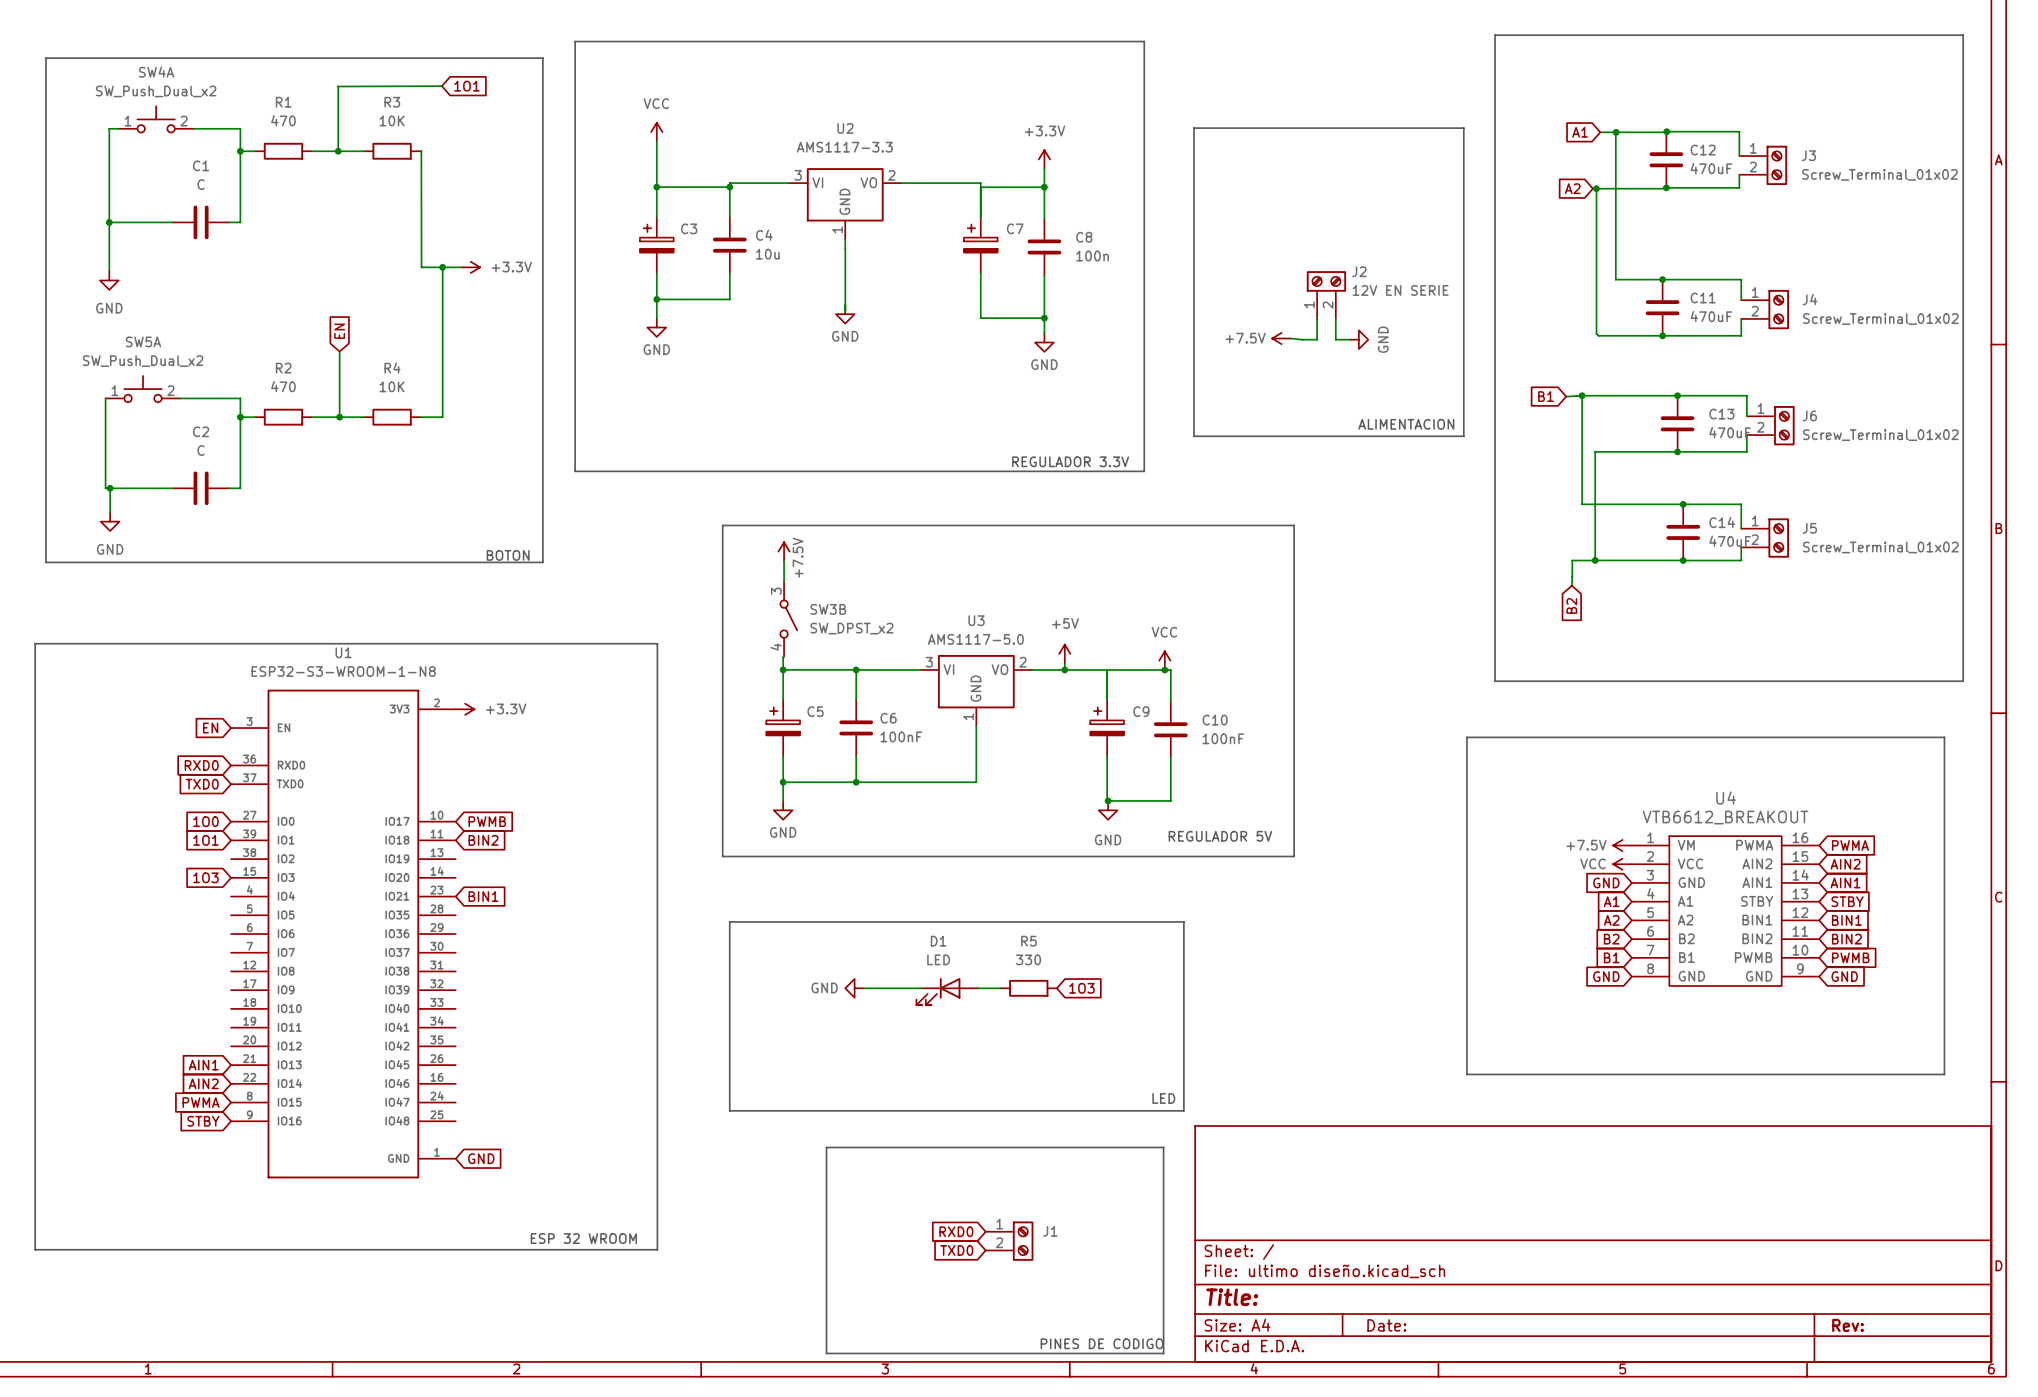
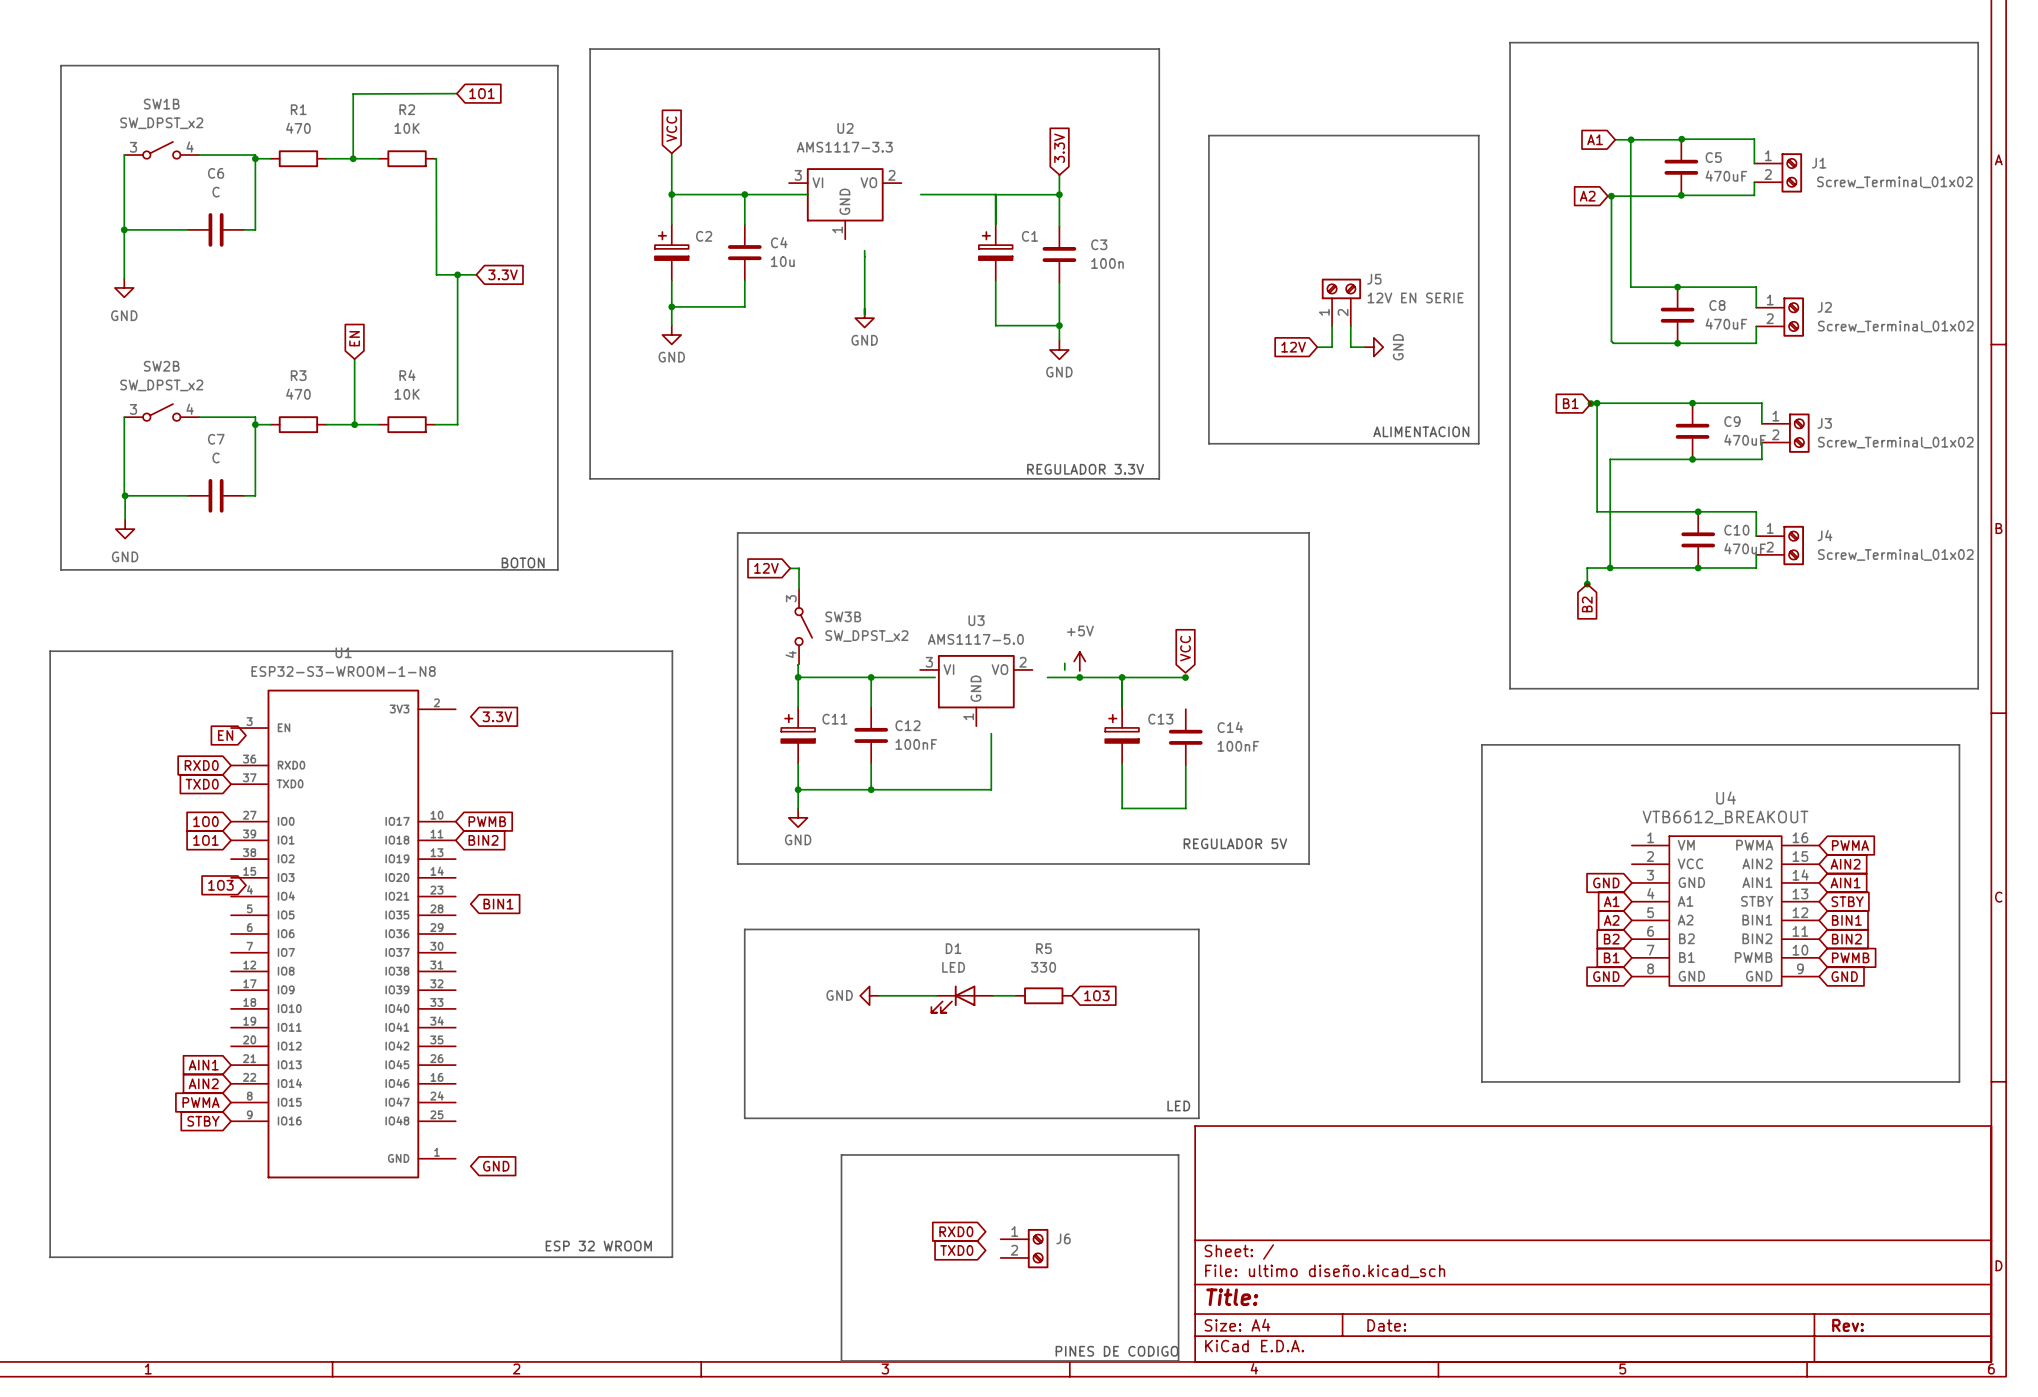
line: (1495, 35) (1963, 35) (1963, 681) (1495, 681) (1495, 35) -> (1510, 42) (1978, 42) (1978, 688) (1510, 688) (1510, 42)
line: (575, 41) (1144, 41) (1144, 471) (575, 471) (575, 41) -> (590, 49) (1159, 49) (1159, 478) (590, 478) (590, 49)
line: (46, 58) (542, 58) (542, 562) (46, 562) (46, 58) -> (60, 65) (557, 65) (557, 569) (60, 569) (60, 65)
wire: (441, 86) (338, 86) (338, 151) -> (456, 93) (353, 93) (353, 158)
global label position: 1O1 (466, 86) -> 1O1 (481, 93)
SW4A: SW_Push_Dual_x2 (156, 119) -> none
R3 value: 10K (392, 120) -> 470 (298, 394)
wire: (118, 128) (109, 128) (109, 271) -> none
wire: (193, 128) (240, 128) (240, 222) (229, 222) -> none
line: (1193, 128) (1463, 128) (1463, 436) (1193, 436) (1193, 128) -> (1208, 135) (1478, 135) (1478, 443) (1208, 443) (1208, 135)
global label: none -> VCC (671, 129)
wire: (1666, 131) (1600, 132) -> (1681, 139) (1615, 139)
wire: (1666, 131) (1739, 131) (1739, 156) -> (1681, 139) (1754, 139) (1754, 163)
junction position: (1666, 131) -> (1681, 139)
power symbol: VCC (656, 132) -> none
global label position: A1 (1580, 132) -> A1 (1595, 139)
wire: (1616, 132) (1615, 279) (1741, 279) (1741, 300) -> (1631, 139) (1630, 287) (1756, 287) (1756, 307)
junction position: (1616, 132) -> (1631, 139)
wire: (656, 141) (656, 217) -> none
global label: none -> 3.3V (1059, 148)
SW1B: none -> SW_DPST_x2 (161, 150)
wire: (240, 151) (255, 151) -> (255, 158) (270, 158)
junction position: (240, 151) -> (255, 158)
R1 position: (283, 151) -> (298, 158)
wire: (311, 151) (363, 151) -> (326, 158) (378, 158)
junction position: (338, 151) -> (353, 158)
R3 position: (392, 151) -> (298, 424)
wire: (420, 151) (421, 267) (461, 267) -> (435, 158) (436, 274) (476, 274)
wire: none -> (671, 153) (671, 224)
wire: none -> (124, 155) (124, 278)
wire: none -> (199, 155) (255, 155) (255, 229) (244, 229)
J3 name position: J3 (1808, 155) -> J3 (1824, 423)
power symbol: +3.3V (1044, 159) -> none
C12 position: (1666, 159) -> (871, 735)
C1 name position: C1 (201, 165) -> C1 (1029, 236)
J3 position: (1763, 165) -> (1785, 433)
wire: (1044, 168) (1044, 218) -> none
C12 value: 470uF (1711, 168) -> 100nF (916, 744)
wire: none -> (1059, 174) (1059, 226)
wire: (1739, 174) (1739, 187) (1592, 188) -> (1754, 182) (1754, 195) (1607, 196)
J3 value position: Screw_Terminal_01x02 (1879, 174) -> Screw_Terminal_01x02 (1895, 442)
C5 value: none -> 470uF (1726, 176)
J1 value: none -> Screw_Terminal_01x02 (1894, 182)
wire: (789, 183) (729, 183) (729, 217) -> none
wire: (901, 183) (980, 183) (980, 217) (980, 187) (1044, 187) -> none
C1 value: C (201, 184) -> none
wire: (656, 187) (729, 187) -> none
junction position: (656, 187) -> (671, 194)
junction position: (729, 187) -> (744, 194)
junction position: (1044, 187) -> (1059, 194)
junction position: (1666, 187) -> (1681, 195)
global label position: A2 (1572, 188) -> A2 (1587, 196)
wire: (1596, 188) (1596, 333) (1598, 335) (1741, 335) (1741, 318) -> (1611, 196) (1611, 341) (1613, 343) (1756, 343) (1756, 326)
junction position: (1596, 188) -> (1611, 196)
wire: none -> (671, 194) (808, 194)
wire: none -> (744, 194) (744, 224)
wire: none -> (920, 194) (995, 194) (995, 224) (995, 194) (1059, 194)
C1 symbol: [172, 205, 230, 240] -> [978, 224, 1013, 281]
C3 symbol: [639, 217, 674, 274] -> [1042, 226, 1077, 283]
C7 symbol: [963, 217, 998, 274] -> [187, 478, 245, 513]
wire: (109, 222) (172, 222) -> (124, 229) (187, 229)
junction position: (109, 222) -> (124, 229)
C7 name position: C7 (1015, 228) -> C7 (216, 439)
wire: (845, 239) (845, 310) (845, 304) -> none
C4 position: (729, 245) -> (744, 252)
C8 position: (1044, 247) -> (1677, 315)
wire: none -> (864, 250) (864, 314) (864, 308)
C8 value: 100n (1092, 256) -> 470uF (1726, 323)
C3 value: none -> 100n (1107, 263)
wire: (442, 267) (442, 417) (420, 417) -> (457, 274) (457, 424) (435, 424)
junction position: (442, 267) -> (457, 274)
power symbol: +3.3V (470, 267) -> none
J2 name position: J2 (1359, 271) -> J2 (1824, 307)
wire: (656, 273) (656, 318) -> (671, 280) (671, 325)
wire: (729, 273) (729, 299) (656, 299) -> (744, 280) (744, 306) (671, 306)
wire: (980, 273) (980, 318) (1044, 318) -> (995, 280) (995, 325) (1059, 325)
global label: none -> 3.3V (503, 274)
wire: (1044, 275) (1044, 333) -> (1059, 282) (1059, 340)
C11 symbol: [1645, 279, 1680, 336] -> [781, 707, 816, 764]
junction position: (1662, 279) -> (1677, 287)
power symbol position: GND (109, 280) -> GND (124, 287)
J2 rotation: 0° (1326, 281) -> 90° clockwise (1793, 317)
J2 value: 12V EN SERIE (1400, 290) -> Screw_Terminal_01x02 (1895, 326)
J2 position: (1326, 295) -> (1780, 317)
junction position: (656, 299) -> (671, 306)
J4 position: (1765, 309) -> (1780, 545)
power symbol position: GND (845, 314) -> GND (864, 318)
C11 value: 470uF (1711, 316) -> none
junction position: (1044, 318) -> (1059, 325)
wire: (1317, 318) (1317, 339) (1290, 338) -> none
wire: (1335, 318) (1335, 339) (1349, 339) -> (1350, 326) (1350, 347) (1364, 347)
wire: none -> (1332, 326) (1332, 347) (1317, 347)
power symbol position: GND (656, 327) -> GND (671, 335)
global label position: EN (339, 331) -> EN (354, 338)
junction position: (1662, 335) -> (1677, 343)
power symbol: +7.5V (1281, 338) -> none
power symbol position: GND (1358, 339) -> GND (1373, 347)
power symbol position: GND (1044, 342) -> GND (1059, 349)
global label: none -> 12V (1293, 347)
wire: (339, 351) (339, 417) -> (354, 359) (354, 424)
R2 value: 470 (283, 386) -> 10K (407, 128)
SW5A: SW_Push_Dual_x2 (143, 389) -> none
wire: (1582, 395) (1582, 504) (1741, 504) (1741, 528) -> (1597, 403) (1597, 511) (1756, 511) (1756, 536)
wire: (1582, 395) (1746, 395) (1746, 416) -> (1597, 403) (1761, 403) (1761, 423)
wire: (1582, 395) (1566, 396) -> none
junction: (1582, 395) -> none
C13 symbol: [1660, 395, 1695, 452] -> [1105, 707, 1139, 764]
junction position: (1677, 395) -> (1692, 403)
global label position: B1 (1546, 396) -> B1 (1570, 403)
wire: (105, 398) (105, 488) (172, 488) -> none
wire: (180, 398) (240, 398) (240, 488) (229, 488) -> none
junction: none -> (1590, 403)
junction: none -> (1597, 403)
SW2B: none -> SW_DPST_x2 (161, 412)
wire: none -> (124, 417) (124, 495) (187, 495)
wire: none -> (199, 417) (240, 417)
junction position: (240, 417) -> (255, 424)
wire: none -> (255, 417) (255, 495) (244, 495)
R2 position: (283, 417) -> (407, 158)
wire: (311, 417) (363, 417) -> (326, 424) (378, 424)
junction position: (339, 417) -> (354, 424)
R4 position: (392, 417) -> (407, 424)
wire: none -> (255, 424) (270, 424)
text position: ALIMENTACION (1406, 424) -> ALIMENTACION (1421, 431)
J6 position: (1770, 425) -> (1024, 1248)
C2 name position: C2 (201, 431) -> C2 (704, 236)
C13 value: 470uF (1730, 432) -> none
wire: (1746, 435) (1746, 451) (1595, 451) (1595, 560) -> (1761, 442) (1761, 459) (1610, 459) (1610, 568)
J6 value: Screw_Terminal_01x02 (1880, 435) -> none
C9 value: none -> 470uF (1745, 440)
C2 value: C (201, 450) -> none
junction position: (1677, 451) -> (1692, 459)
C7 value: none -> C (216, 458)
text position: REGULADOR 3.3V (1070, 461) -> REGULADOR 3.3V (1085, 469)
C2 symbol: [172, 471, 230, 506] -> [654, 224, 689, 281]
wire: (110, 488) (110, 512) -> (125, 495) (125, 519)
junction position: (110, 488) -> (125, 495)
junction position: (1683, 504) -> (1698, 511)
power symbol position: GND (110, 521) -> GND (125, 529)
C14 name position: C14 (1722, 522) -> C14 (1230, 727)
line: (722, 525) (1294, 525) (1294, 856) (722, 856) (722, 525) -> (737, 532) (1309, 532) (1309, 863) (737, 863) (737, 532)
J5 name position: J5 (1809, 528) -> J5 (1374, 279)
C14 position: (1683, 532) -> (1185, 737)
J5 position: (1765, 538) -> (1341, 302)
J5 rotation: 0° (1778, 538) -> 90° counterclockwise (1341, 288)
C14 value: 470uF (1730, 541) -> 100nF (1238, 746)
wire: (1741, 547) (1741, 560) (1683, 560) -> (1756, 554) (1756, 568) (1698, 568)
J5 value: Screw_Terminal_01x02 (1880, 547) -> 12V EN SERIE (1415, 297)
power symbol: +7.5V (784, 551) -> none
text position: BOTON (508, 555) -> BOTON (523, 562)
wire: (1595, 560) (1683, 560) -> (1610, 567) (1698, 567)
wire: (1595, 560) (1572, 560) (1571, 585) -> none
junction: (1595, 560) -> none
junction position: (1683, 560) -> (1698, 568)
wire: (784, 561) (784, 581) -> (799, 568) (799, 589)
junction: none -> (1610, 567)
global label: none -> 12V (766, 568)
wire: none -> (790, 568) (799, 568)
wire: none -> (1610, 568) (1587, 568) (1587, 584)
junction: none -> (1587, 584)
global label position: B2 (1571, 605) -> B2 (1587, 604)
SW3B position: (788, 619) -> (803, 626)
line: (35, 643) (657, 643) (657, 1249) (35, 1249) (35, 643) -> (50, 651) (672, 651) (672, 1257) (50, 1257) (50, 651)
global label: none -> VCC (1185, 648)
power symbol position: +5V (1064, 653) -> +5V (1079, 661)
wire: (784, 656) (783, 699) -> (799, 664) (798, 707)
power symbol: VCC (1164, 660) -> none
wire: (783, 669) (856, 669) (856, 699) -> (798, 677) (871, 677) (871, 707)
junction position: (783, 669) -> (798, 677)
wire: (856, 669) (920, 669) -> (871, 677) (935, 677)
junction position: (856, 669) -> (871, 677)
wire: (1032, 669) (1107, 669) (1107, 699) (1107, 670) (1170, 670) (1170, 701) -> none
junction position: (1064, 669) -> (1079, 677)
junction: (1164, 670) -> none
wire: none -> (1047, 677) (1185, 677)
wire: none -> (1122, 677) (1122, 707) (1122, 677)
junction: none -> (1122, 677)
junction: none -> (1185, 677)
C5 symbol: [766, 699, 801, 757] -> [1664, 139, 1699, 196]
C9 symbol: [1090, 699, 1124, 757] -> [1675, 403, 1710, 460]
power symbol: +3.3V (465, 709) -> none
global label: none -> 3.3V (497, 716)
C6 name position: C6 (888, 718) -> C6 (216, 173)
C10 name position: C10 (1215, 720) -> C10 (1736, 530)
wire: (976, 726) (976, 782) (783, 782) -> (991, 733) (991, 789) (798, 789)
C6 rotation: 0° (856, 727) -> 90° clockwise (216, 229)
C6 position: (856, 727) -> (216, 229)
global label position: EN (210, 728) -> EN (225, 735)
C10 position: (1170, 729) -> (1698, 539)
C6 value: 100nF (901, 736) -> C (216, 192)
line: (1466, 737) (1944, 737) (1944, 1074) (1466, 1074) (1466, 737) -> (1481, 744) (1959, 744) (1959, 1081) (1481, 1081) (1481, 744)
C10 value: 100nF (1223, 738) -> 470uF (1745, 548)
wire: (783, 756) (783, 800) -> (798, 763) (798, 808)
wire: (856, 756) (856, 782) -> (871, 763) (871, 789)
wire: (1107, 756) (1107, 800) (1170, 800) (1170, 757) -> (1122, 763) (1122, 808) (1185, 808) (1185, 765)
junction position: (783, 782) -> (798, 789)
junction position: (856, 782) -> (871, 789)
junction: (1108, 800) -> none
power symbol position: GND (783, 810) -> GND (798, 817)
power symbol: GND (1108, 810) -> none
text position: REGULADOR 5V (1220, 836) -> REGULADOR 5V (1235, 843)
power symbol: +7.5V (1622, 845) -> none
power symbol: VCC (1622, 864) -> none
global label position: 1O3 (205, 877) -> 1O3 (220, 885)
global label position: BIN1 (483, 896) -> BIN1 (498, 904)
line: (729, 921) (1183, 921) (1183, 1110) (729, 1110) (729, 921) -> (744, 929) (1198, 929) (1198, 1118) (744, 1118) (744, 929)
power symbol position: GND (854, 988) -> GND (869, 995)
wire: (863, 988) (922, 988) -> (878, 995) (937, 995)
wire: (978, 988) (1000, 988) -> (993, 995) (1015, 995)
R5 position: (1028, 988) -> (1043, 995)
global label position: 1O3 (1081, 988) -> 1O3 (1096, 995)
D1 position: (947, 991) -> (962, 999)
text position: LED (1163, 1098) -> LED (1178, 1105)
line: (826, 1147) (1163, 1147) (1163, 1353) (826, 1353) (826, 1147) -> (841, 1154) (1178, 1154) (1178, 1360) (841, 1360) (841, 1154)
global label position: GND (481, 1158) -> GND (496, 1166)
text position: ESP 32 WROOM (583, 1238) -> ESP 32 WROOM (598, 1246)
J1 position: (1009, 1241) -> (1778, 172)
text position: PINES DE CODIGO (1102, 1343) -> PINES DE CODIGO (1117, 1351)

